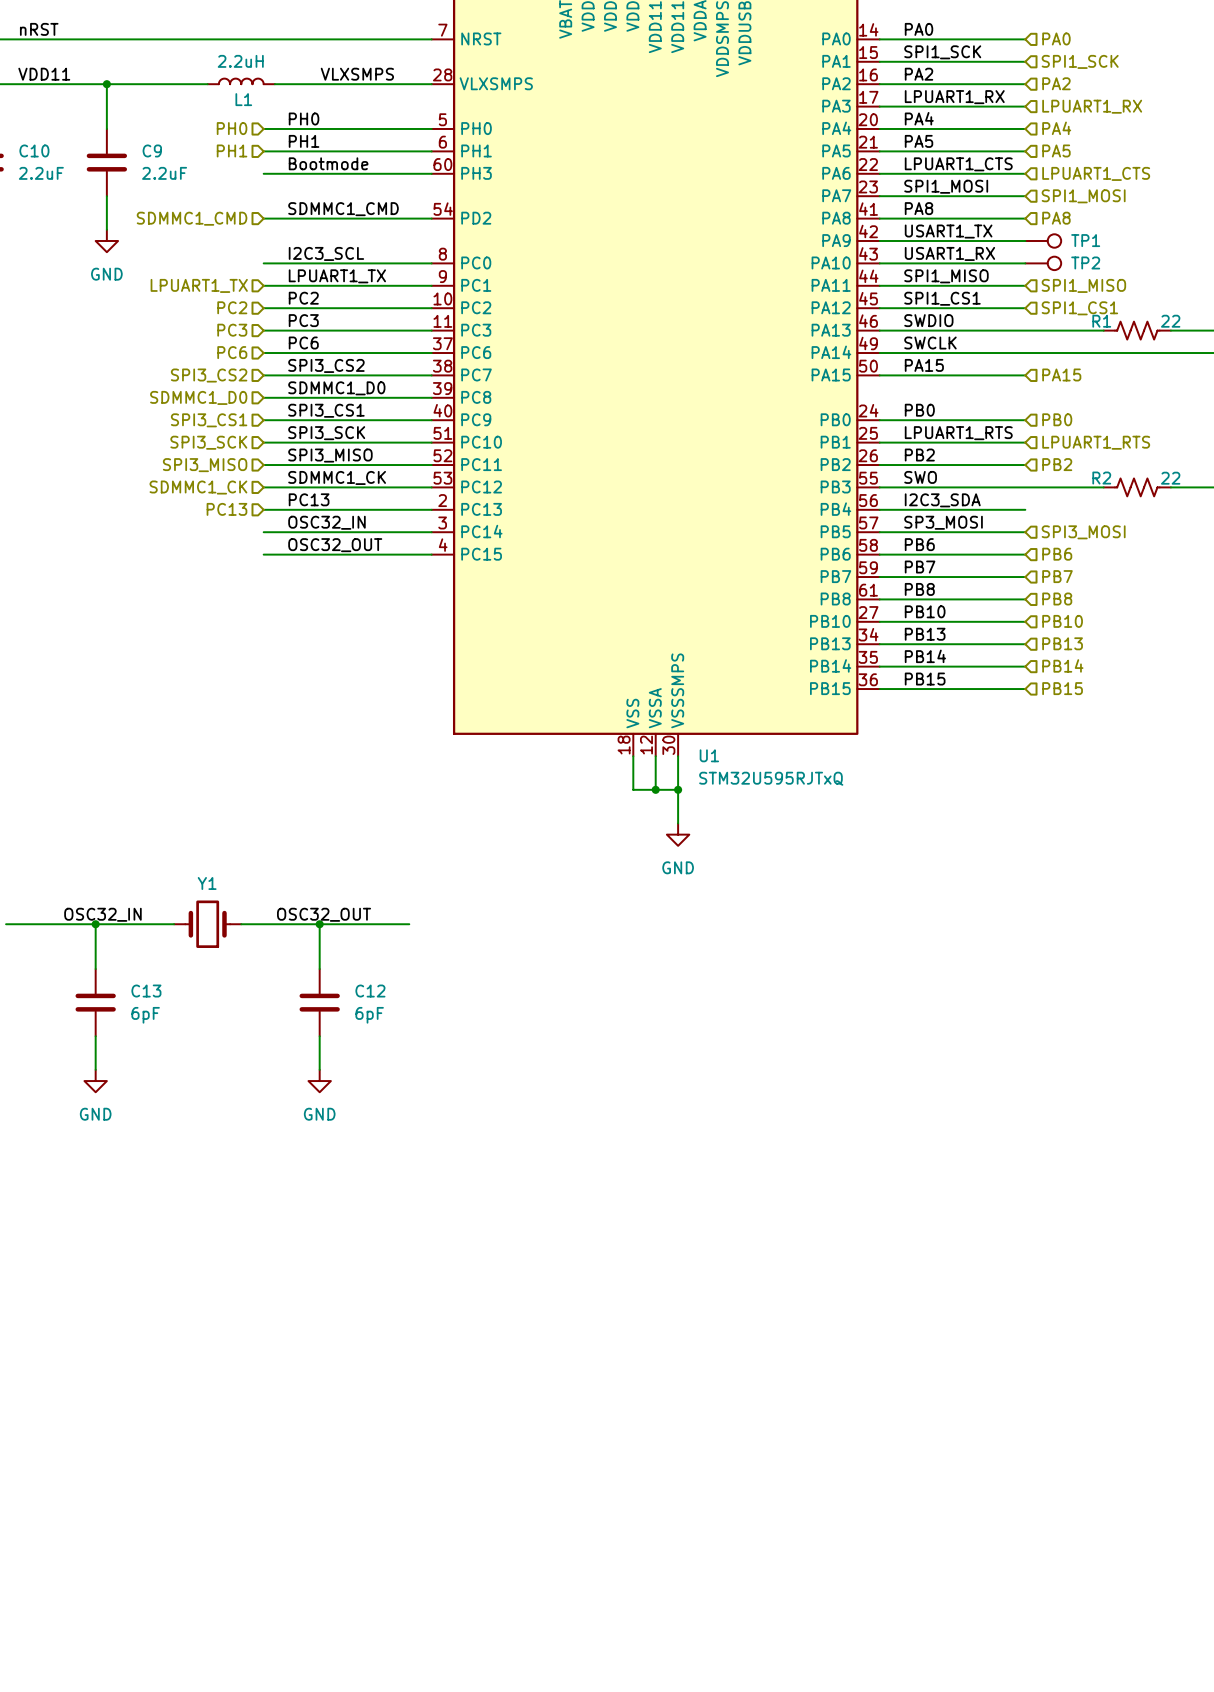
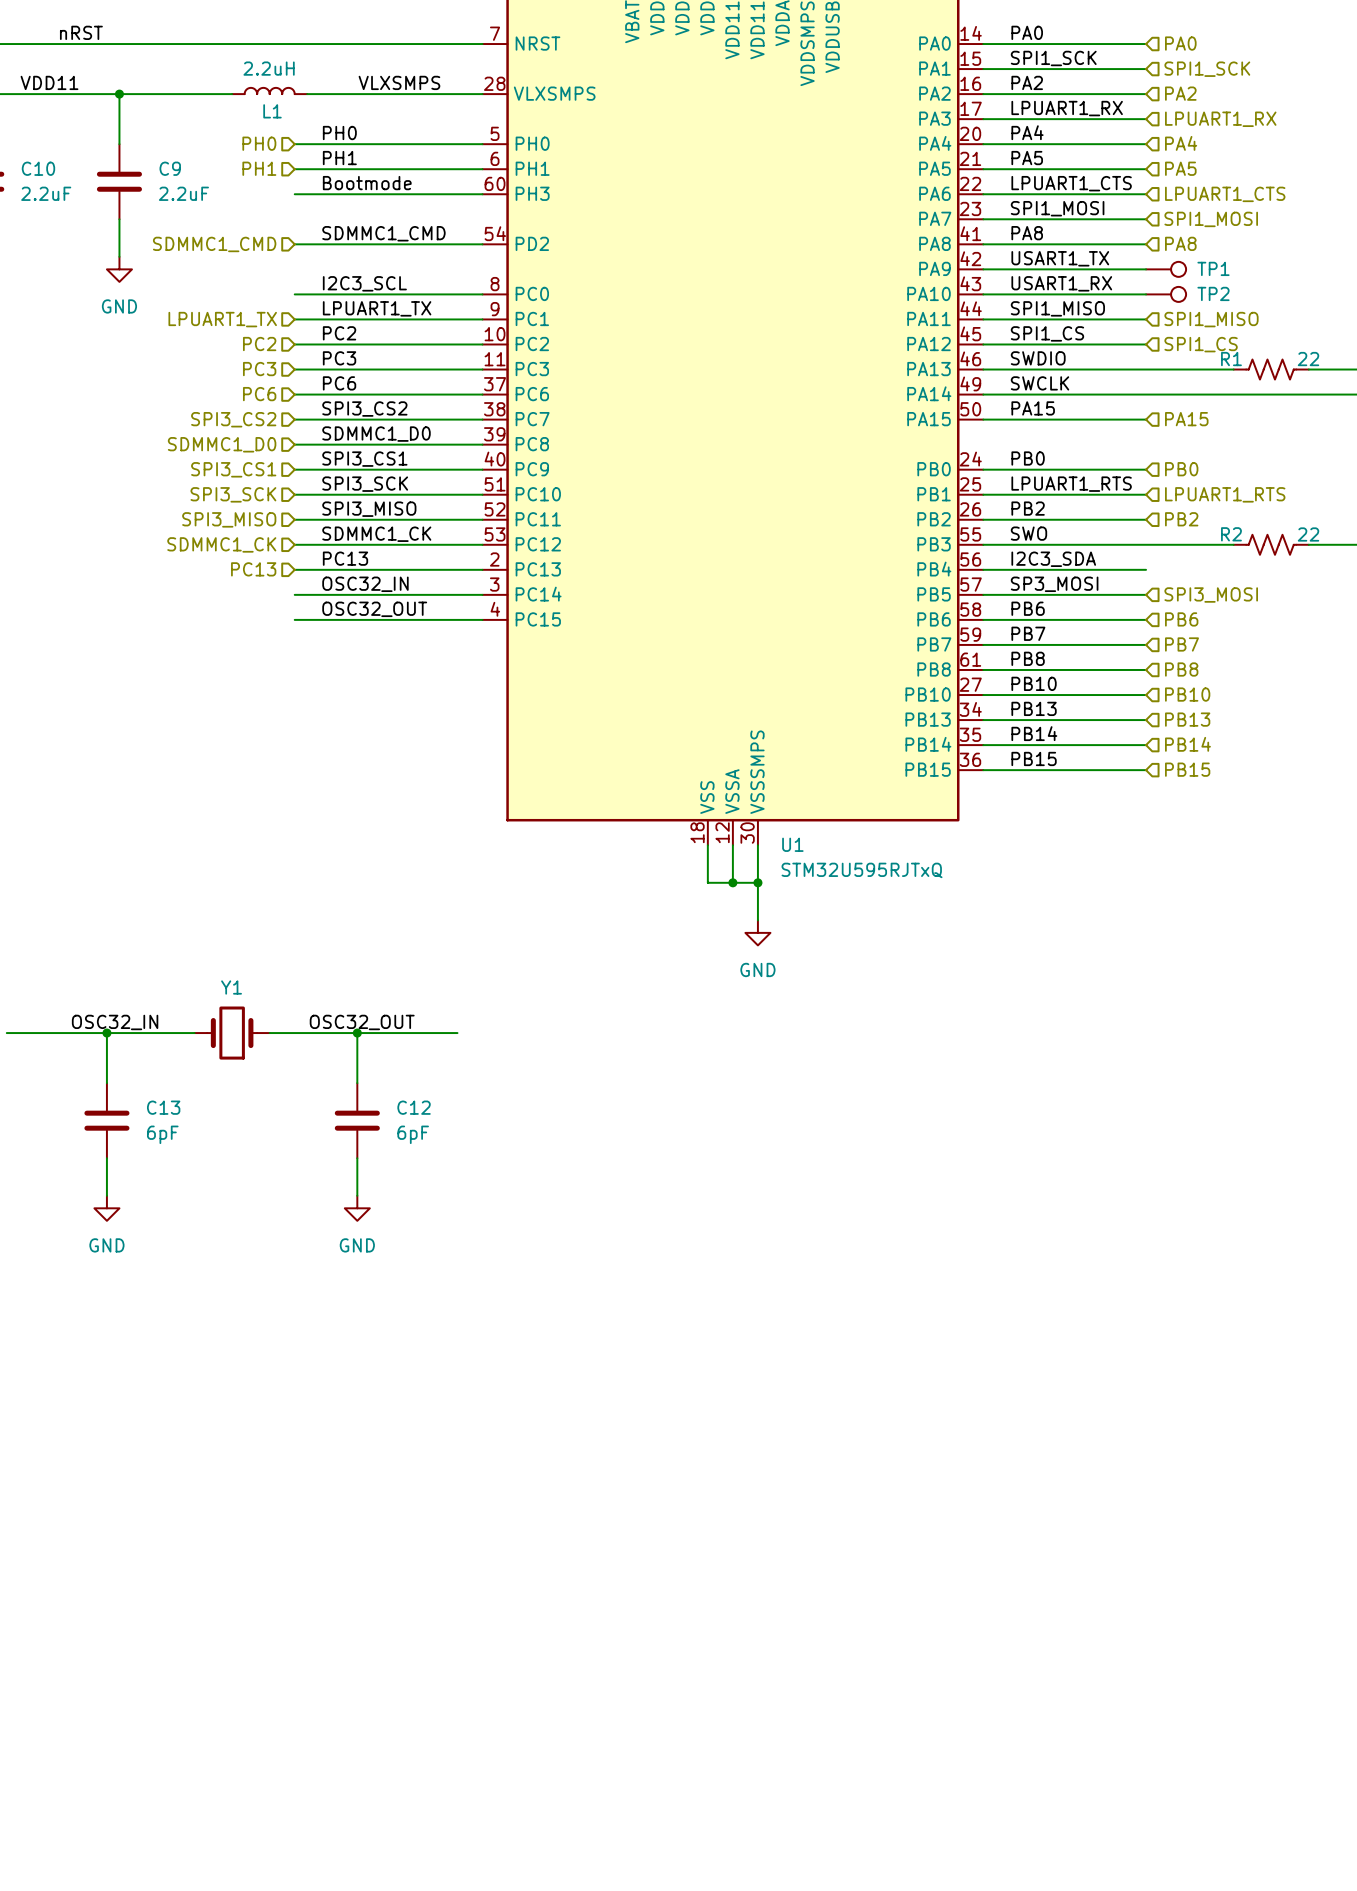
label position: nRST (39, 29) -> nRST (81, 32)
label: SPI1_CS1 (942, 298) -> SPI1_CS (1047, 333)
hierarchical label: SPI1_CS1 (1079, 308) -> SPI1_CS (1201, 344)

